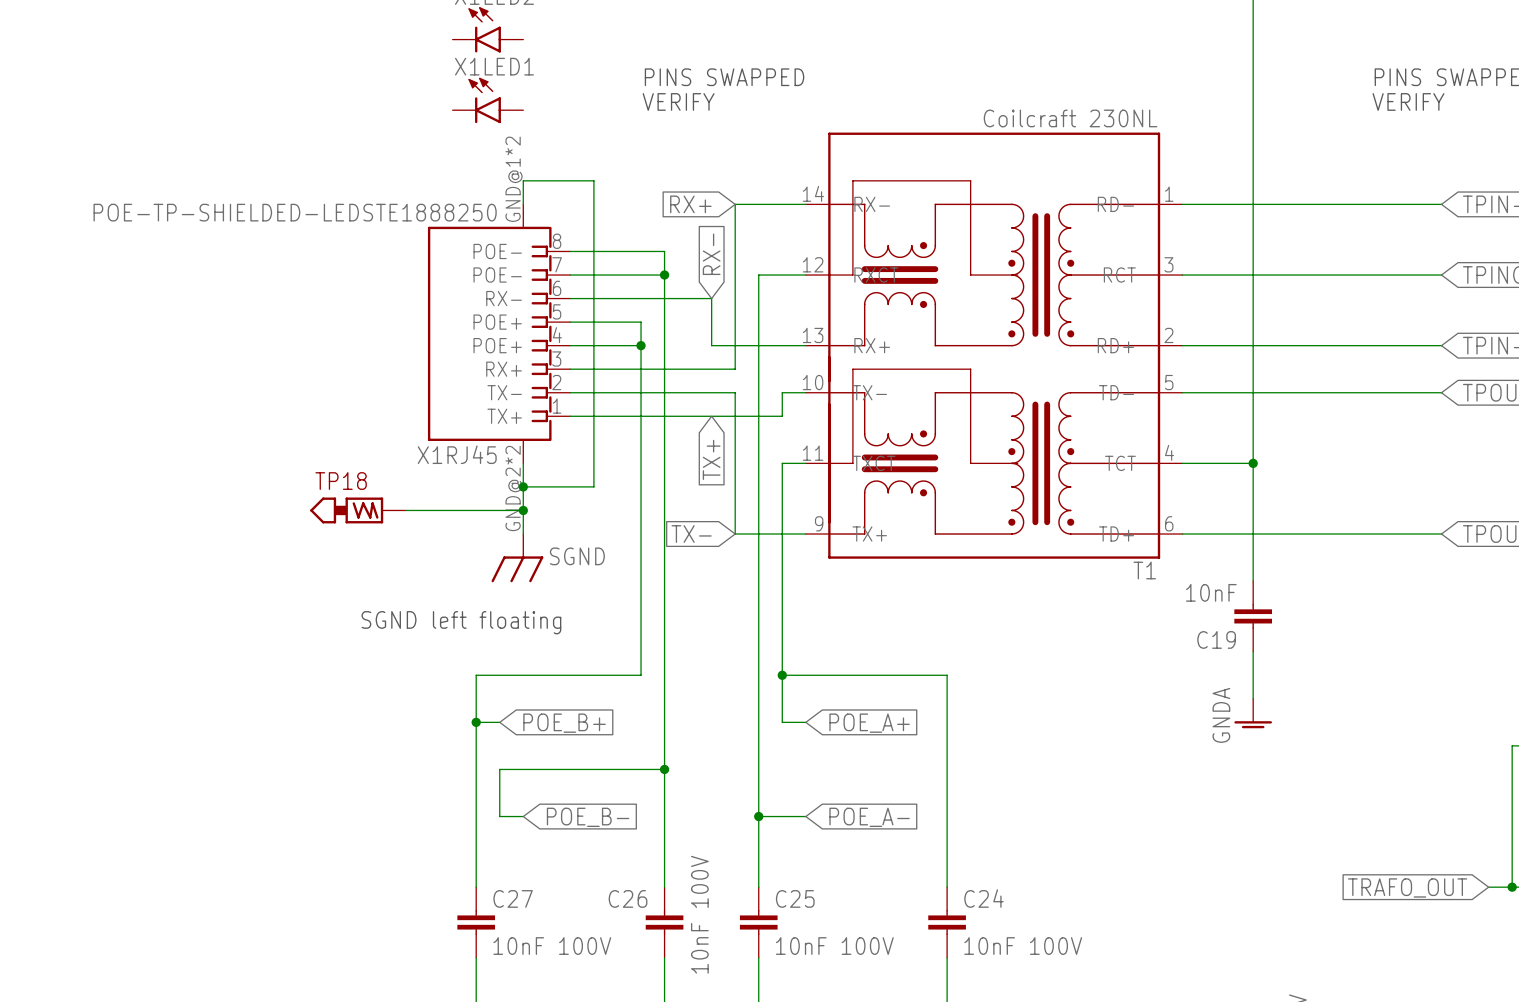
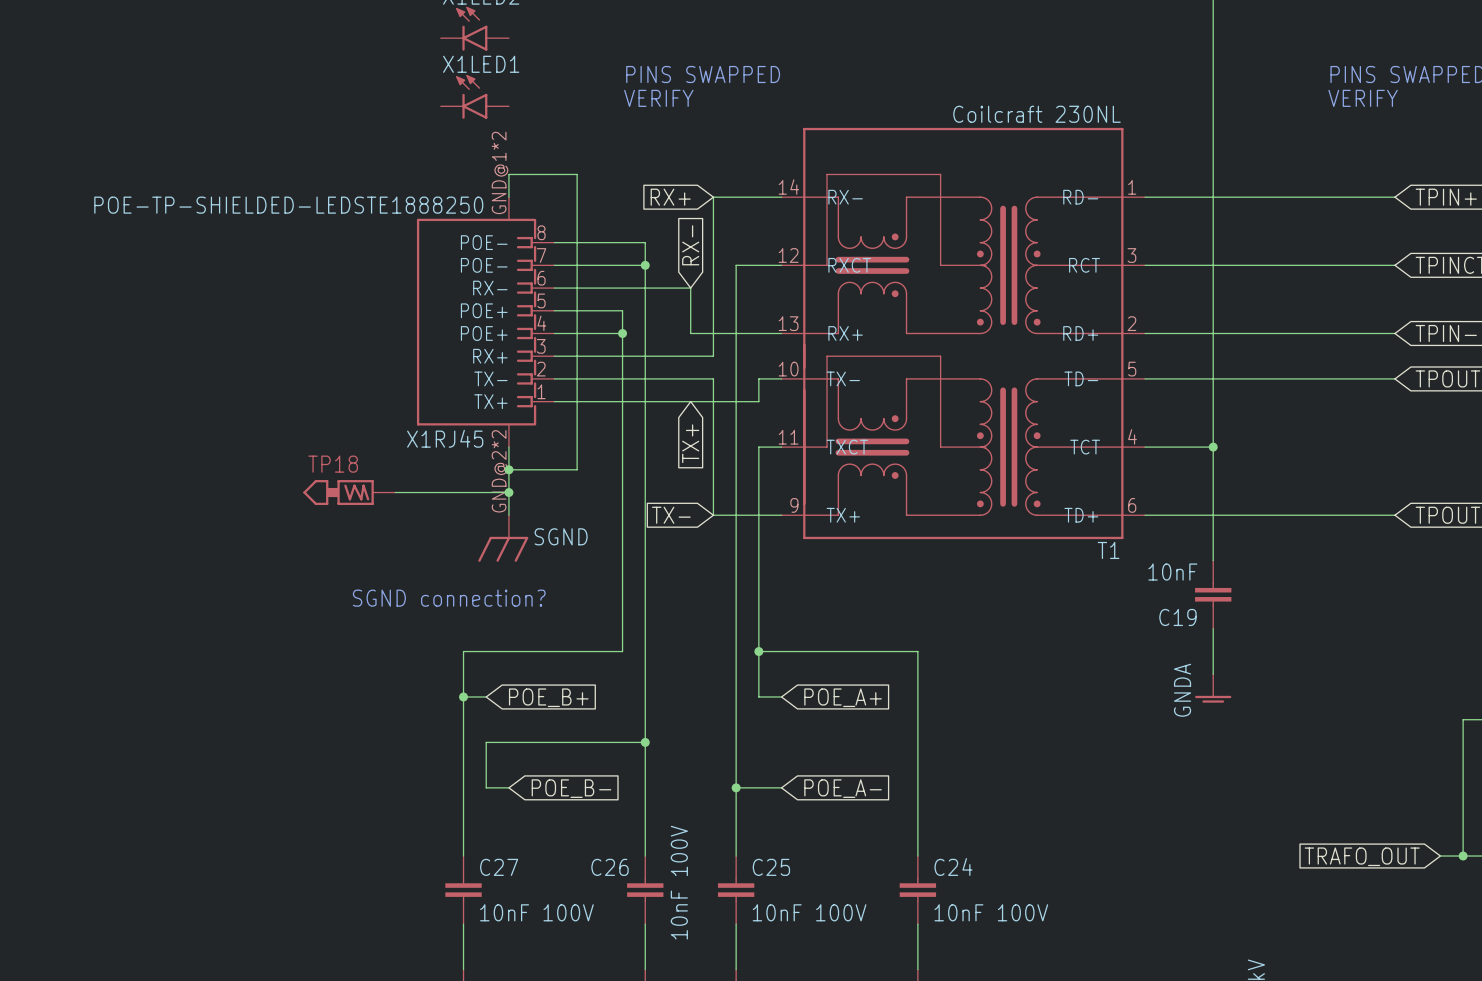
text: SGND left floating (461, 622) -> SGND connection? (449, 598)

